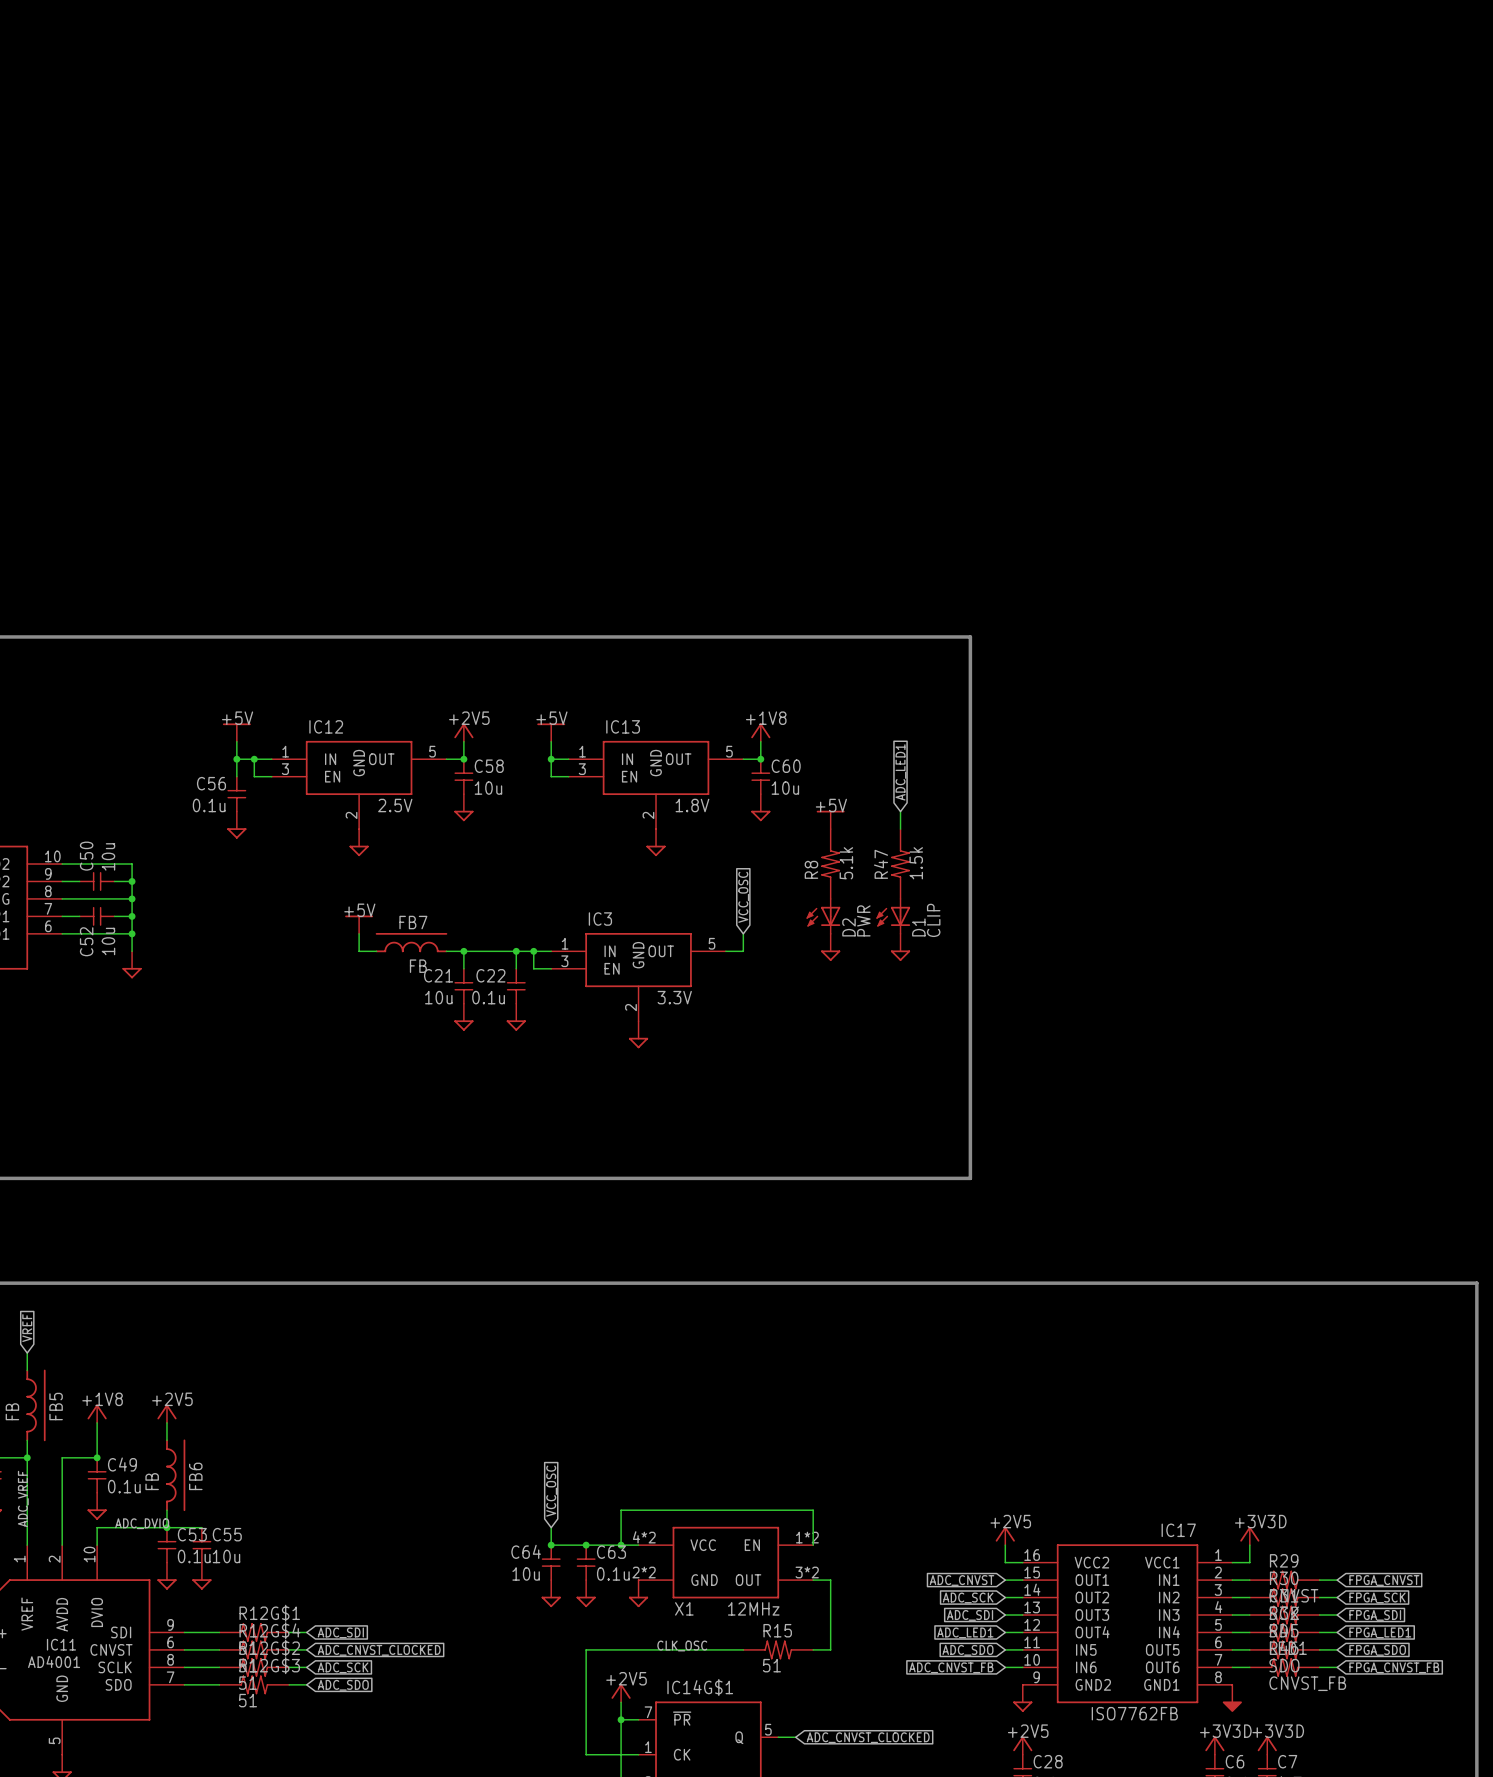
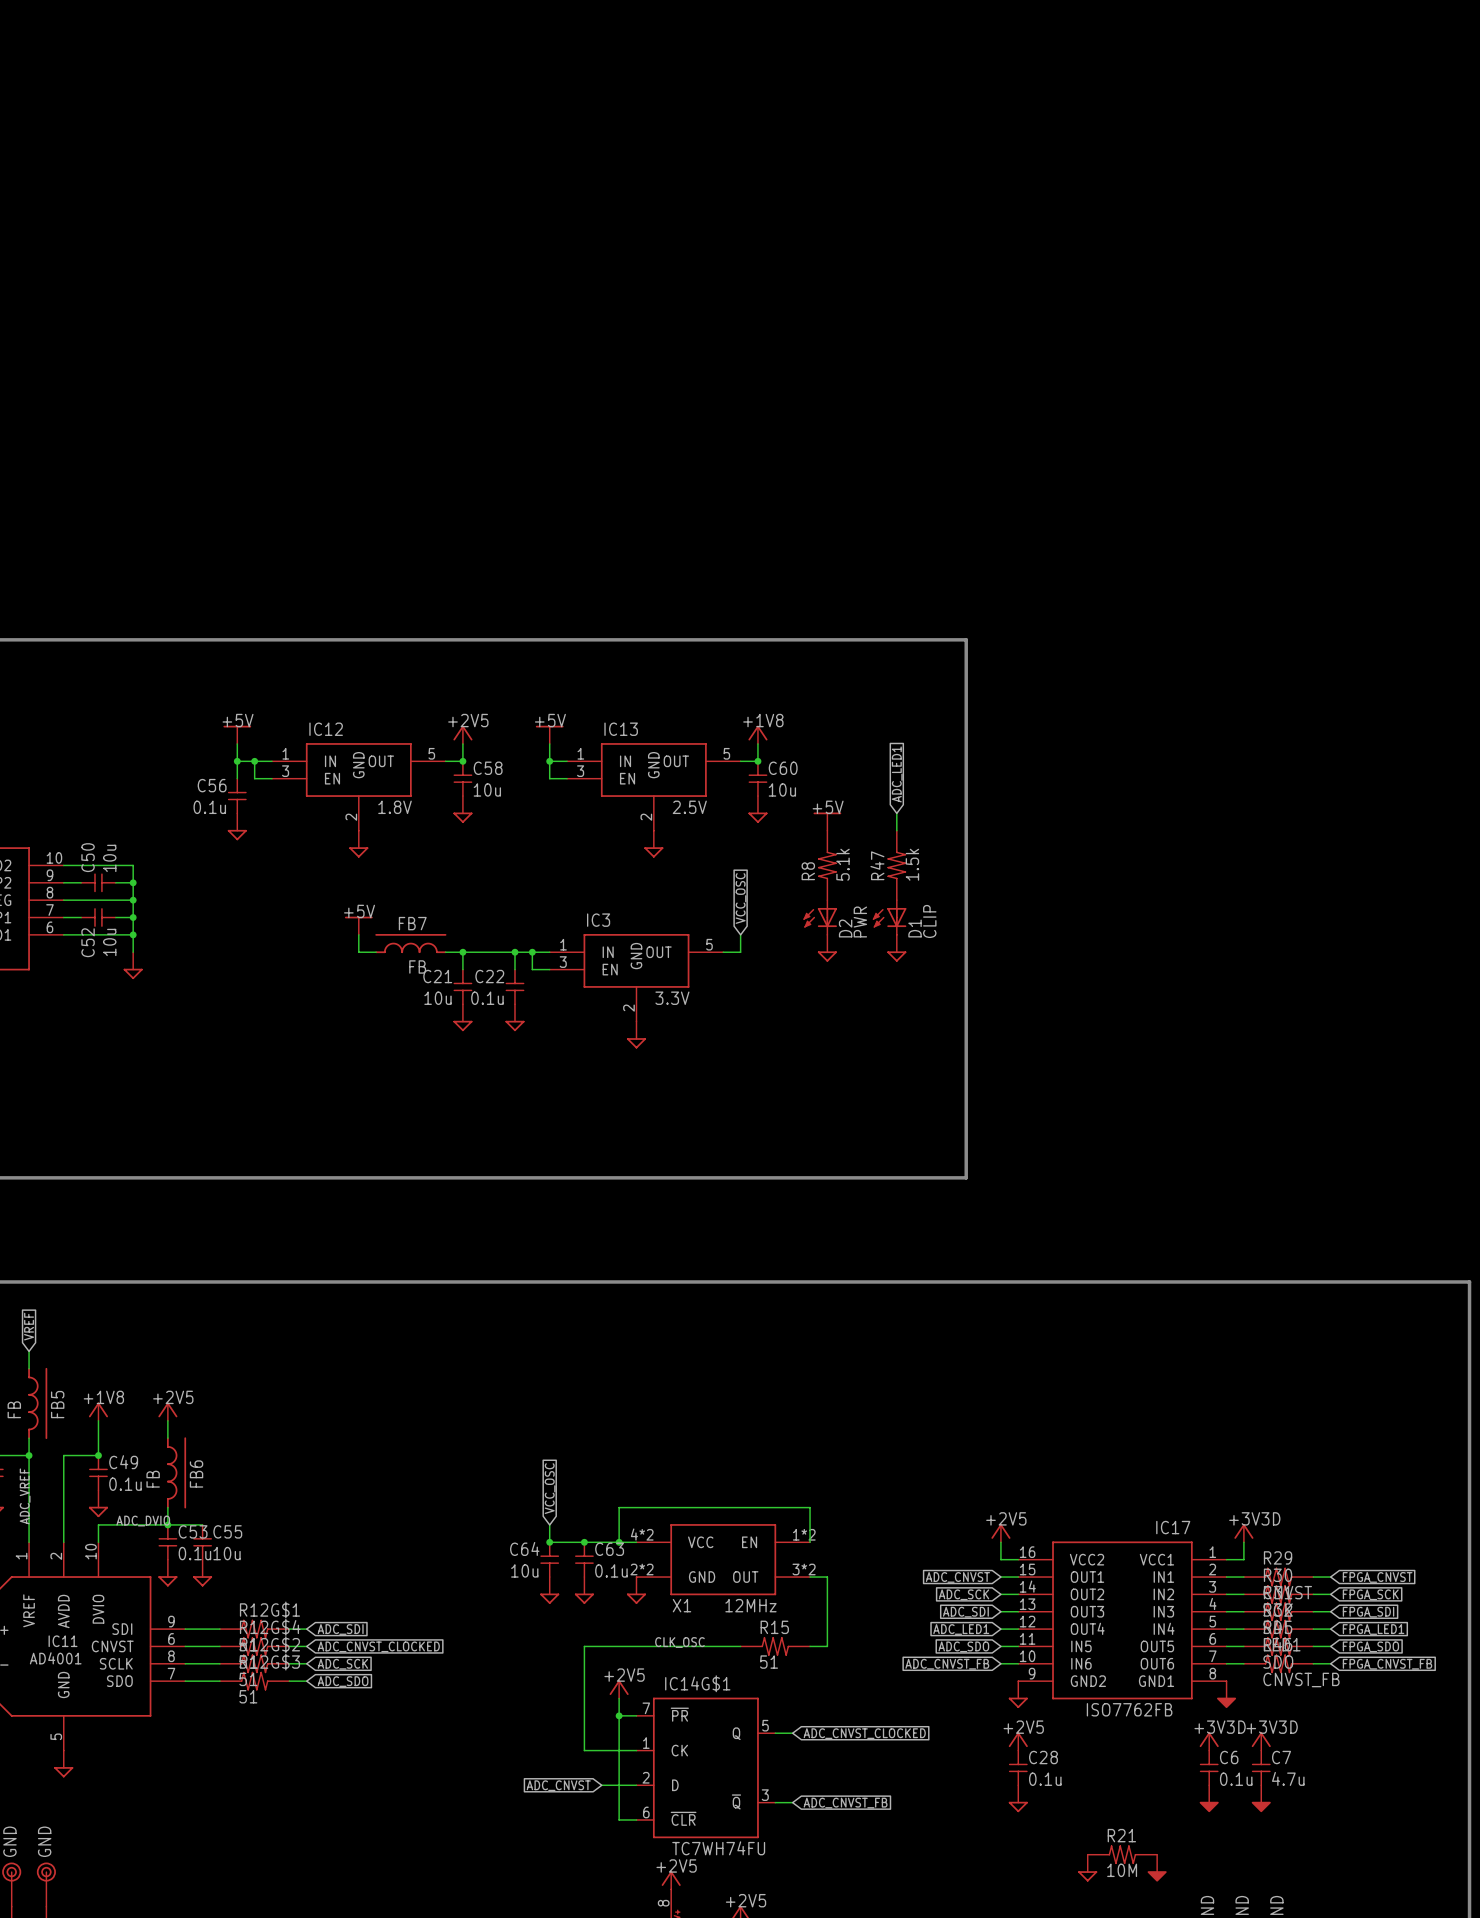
IC12 value: 2.5V (395, 805) -> 1.8V (395, 807)
IC13 value: 1.8V (692, 805) -> 2.5V (689, 807)

